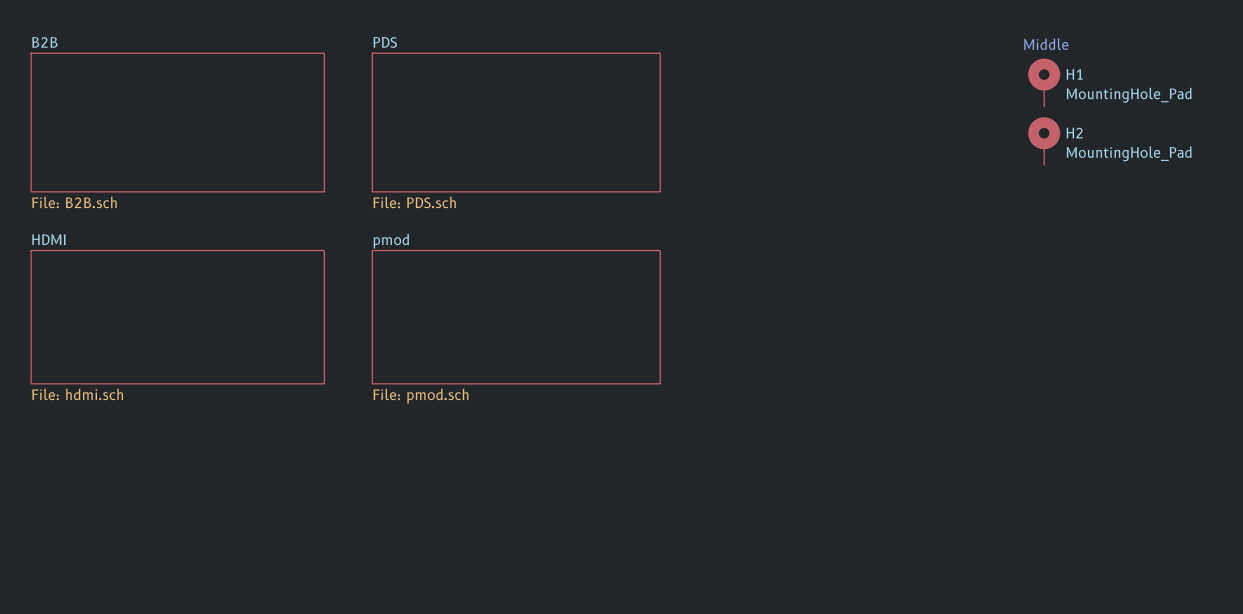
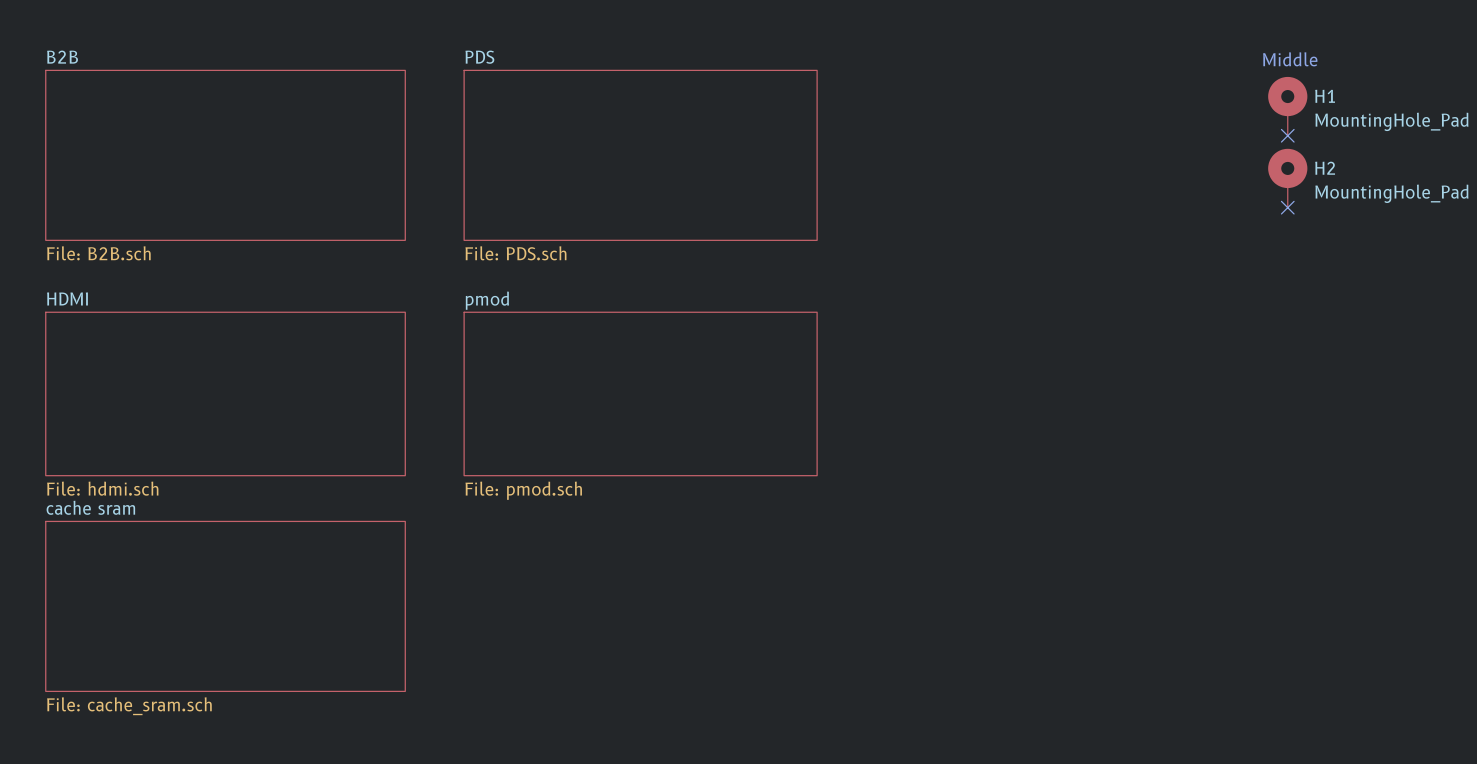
no-connect mark: none -> (1287, 135)
no-connect mark: none -> (1287, 207)
sheet cache sram: none -> File: cache_sram.sch (225, 606)

